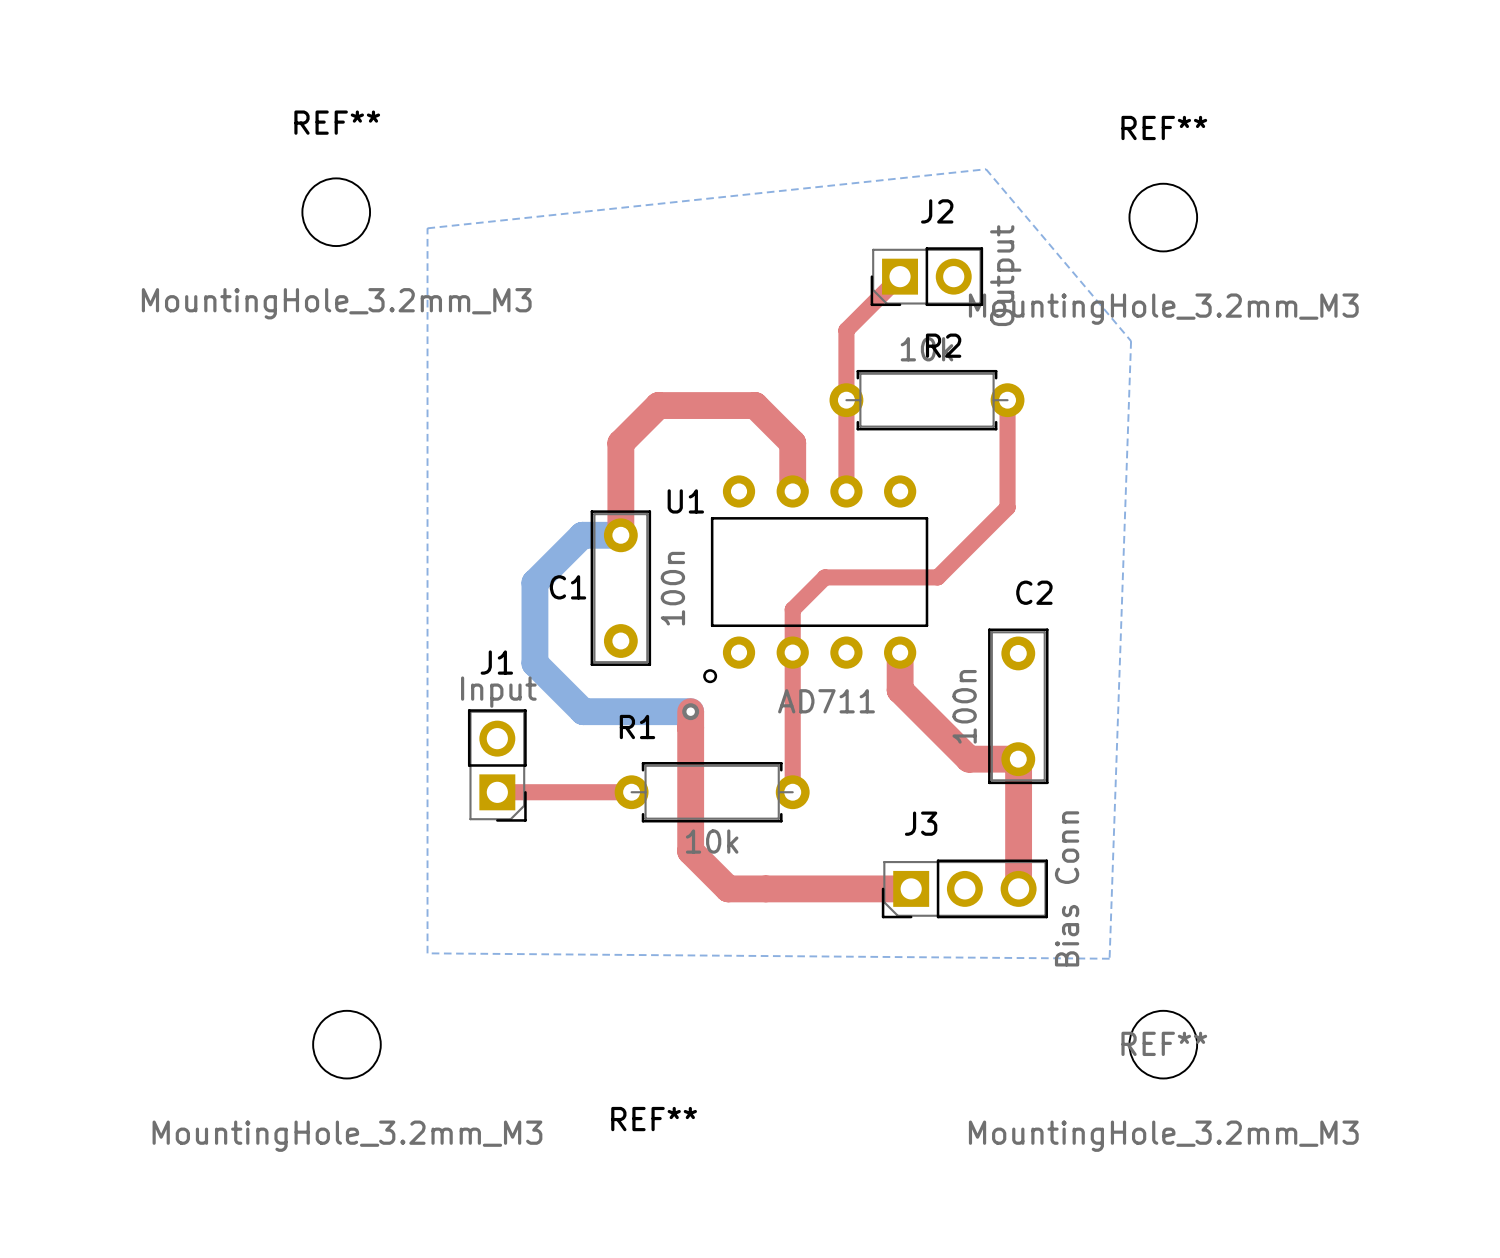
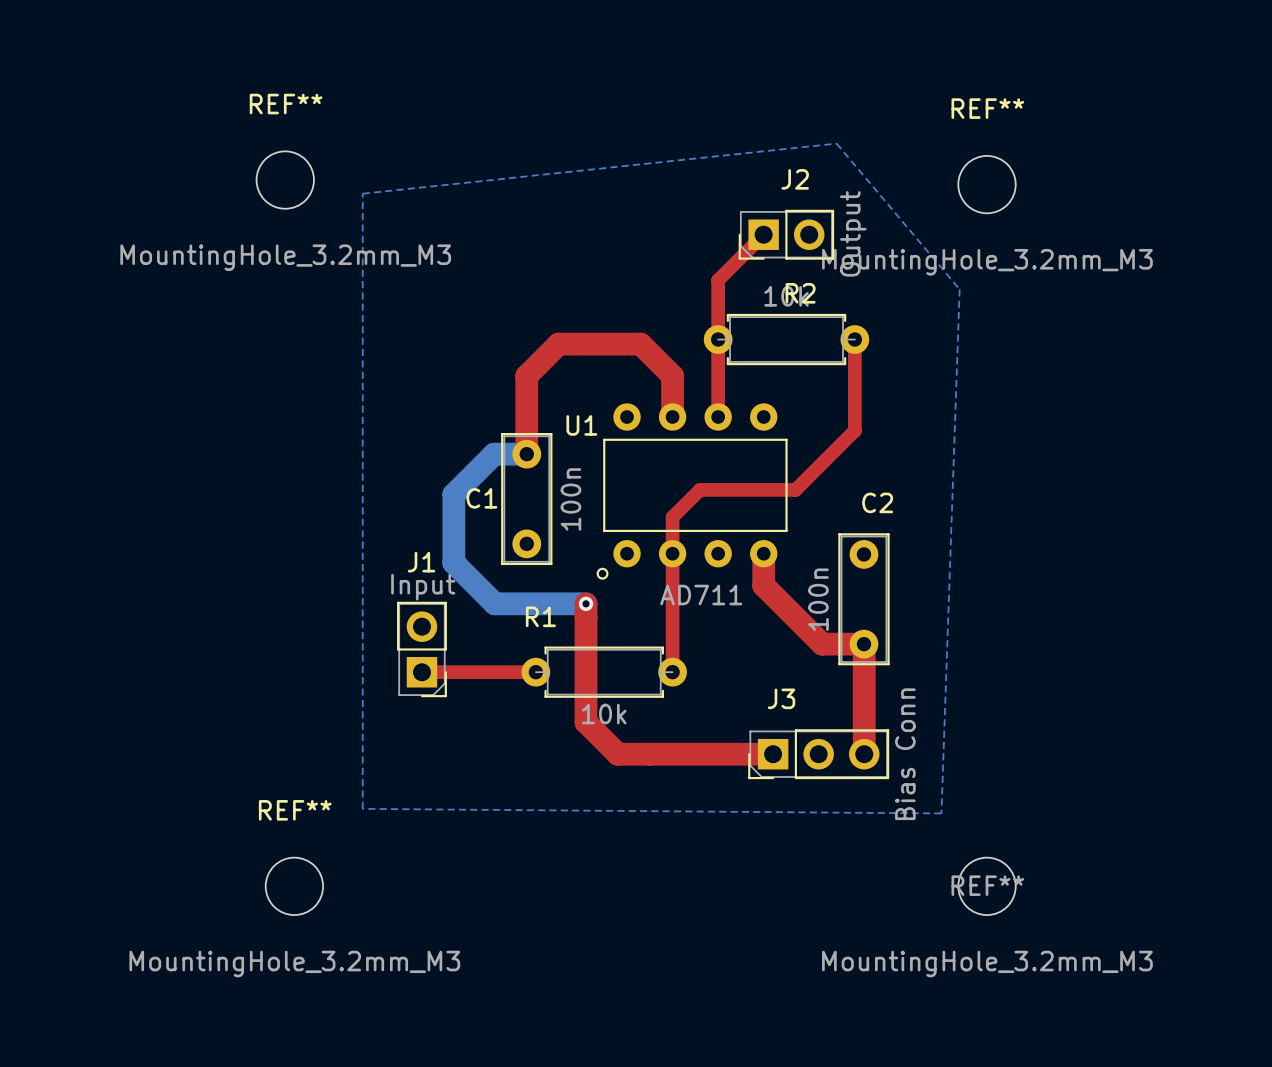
REF** name position: REF** (654, 1119) -> REF** (295, 810)

